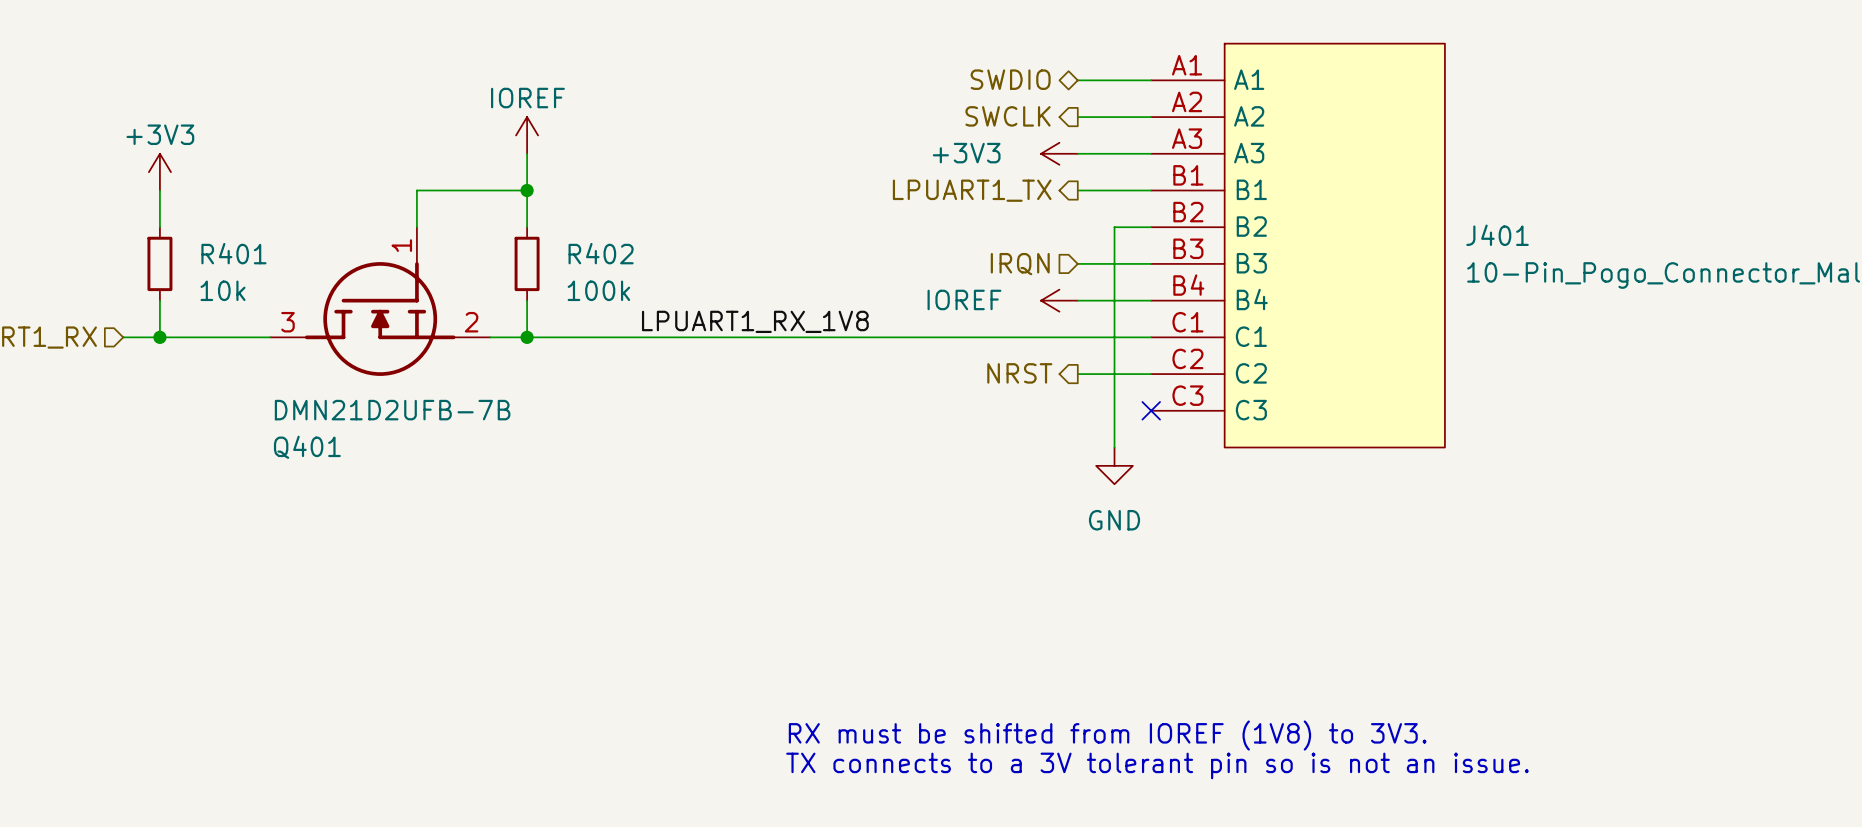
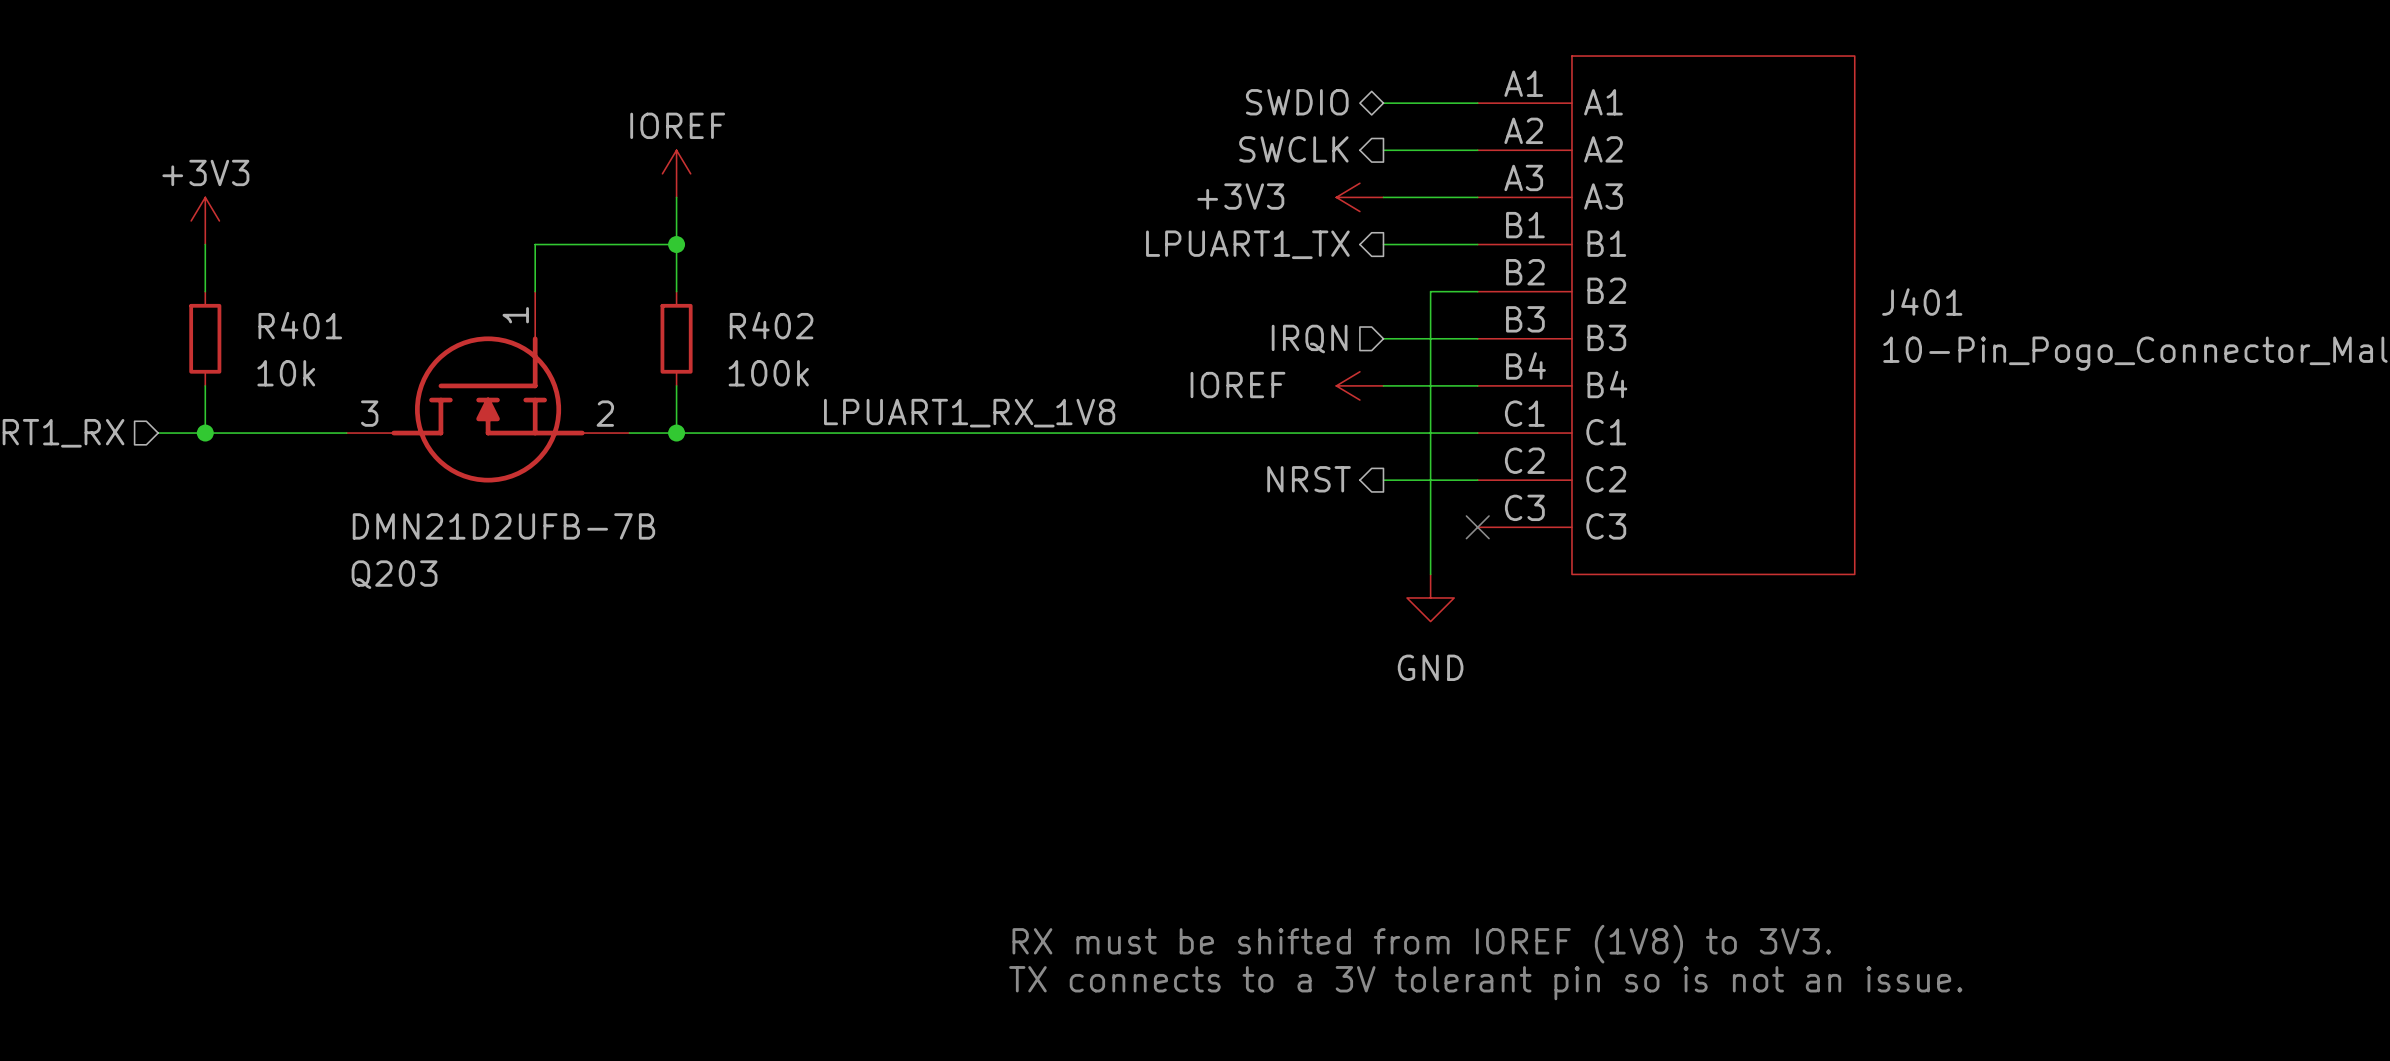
Q401 name: Q401 (307, 447) -> Q203 (394, 574)

